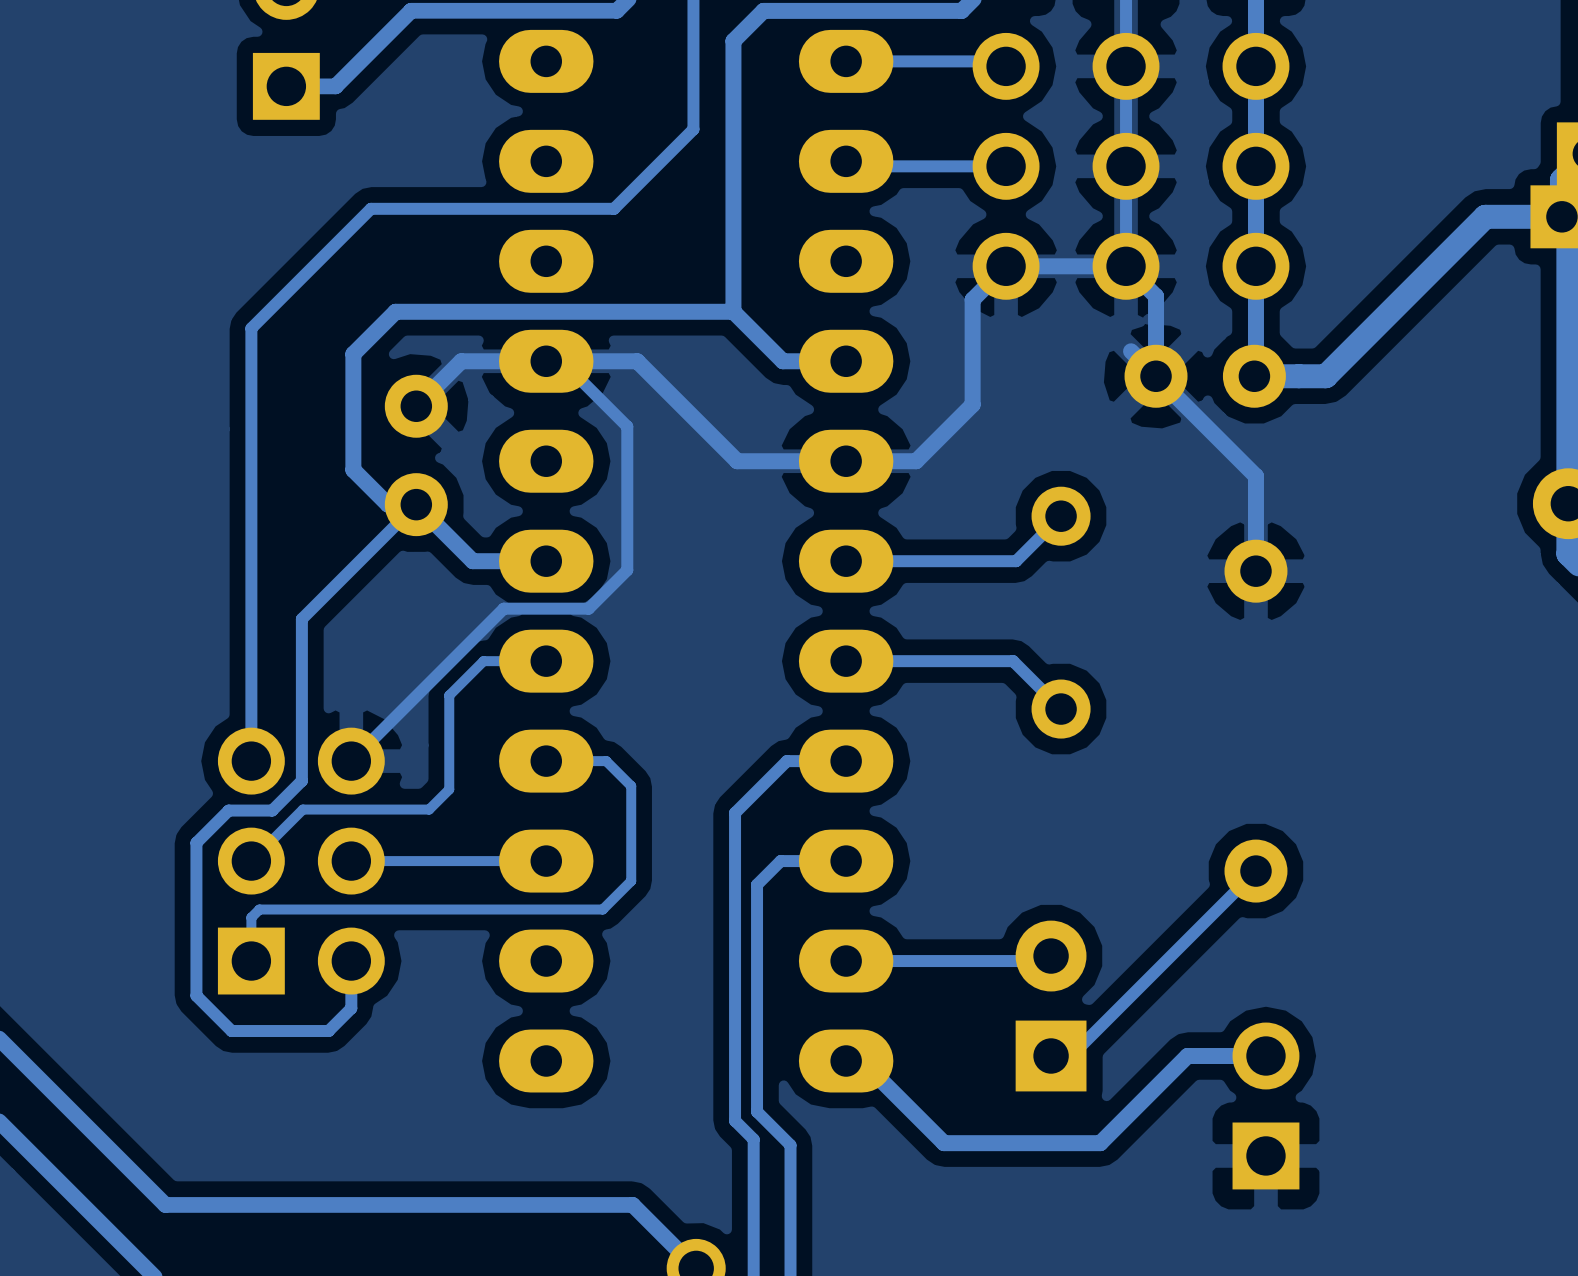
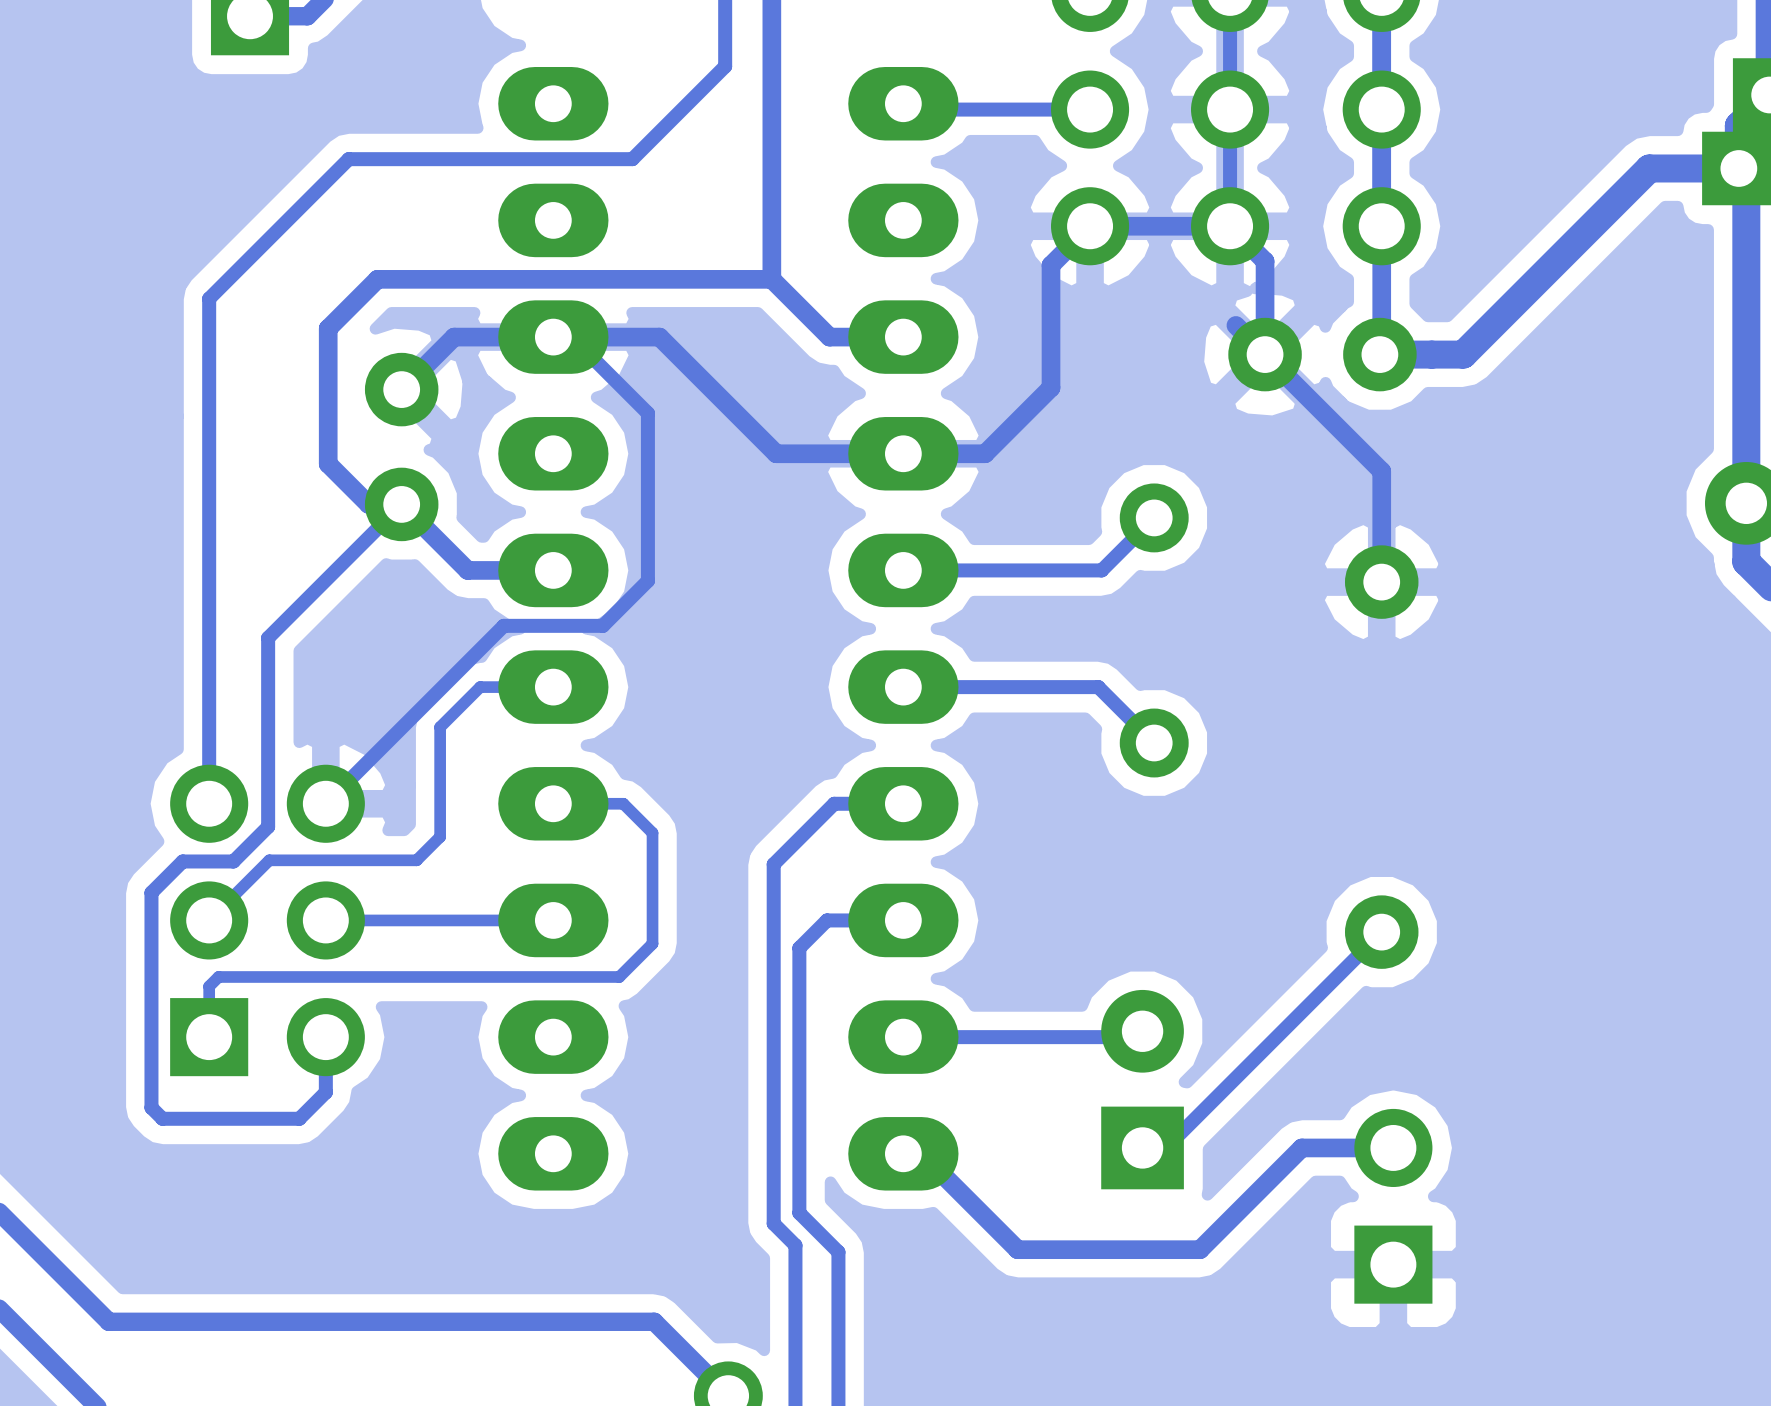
track: (201, 837) (196, 842) (196, 995) (231, 1031) -> (151, 892) (151, 1107) (162, 1118) (186, 1118)

